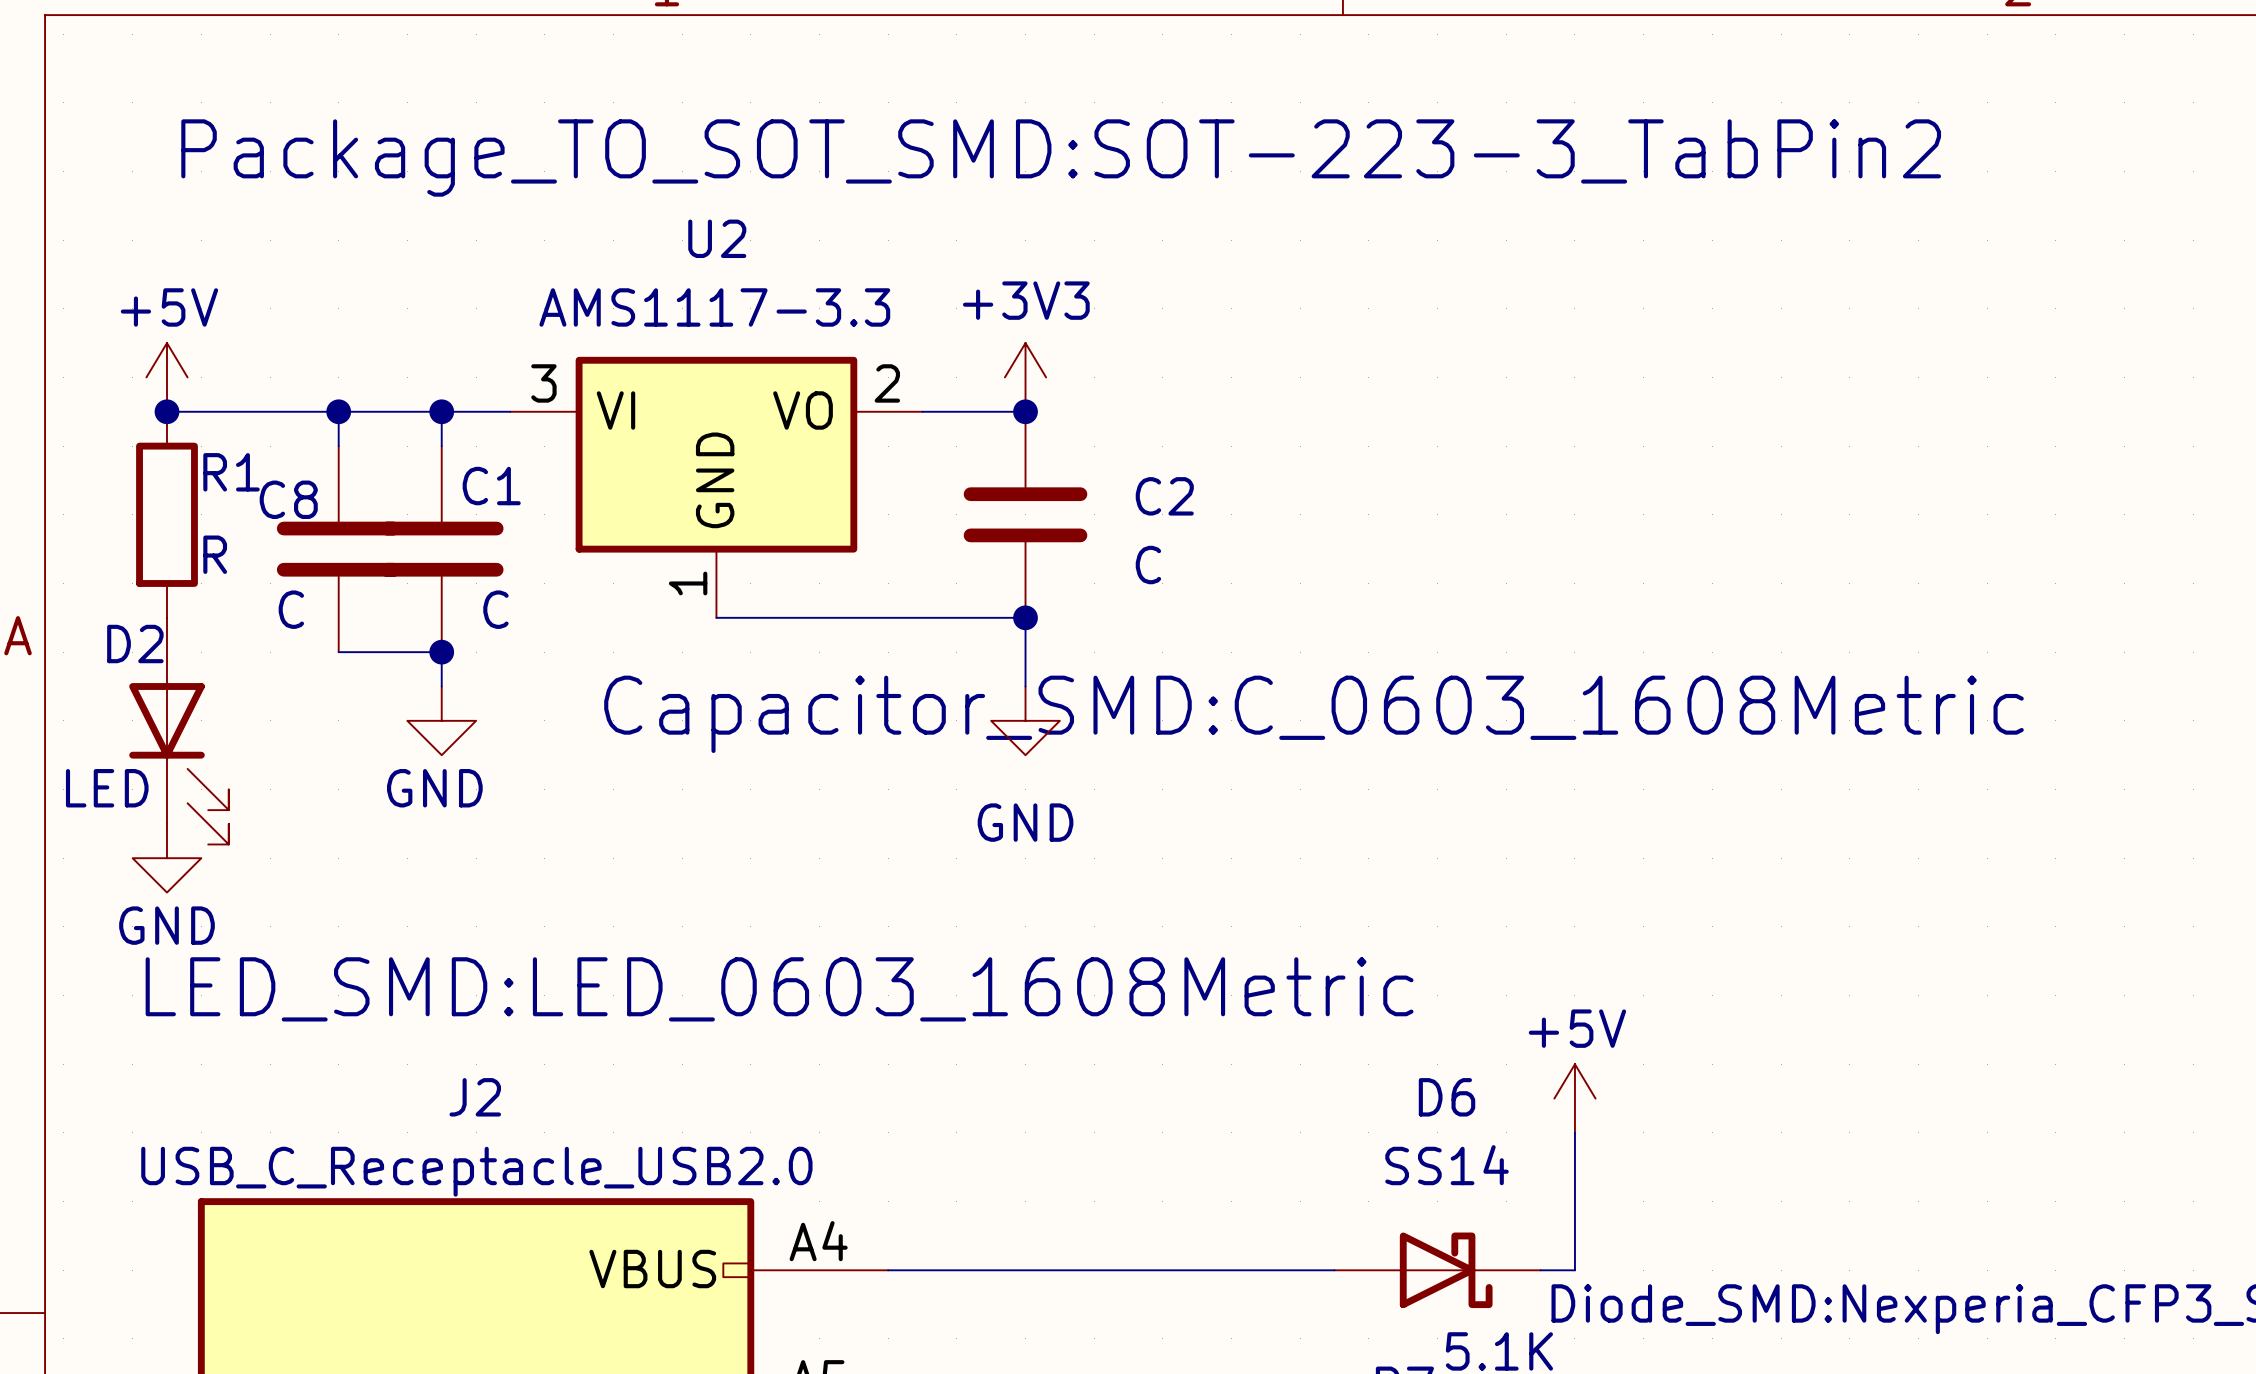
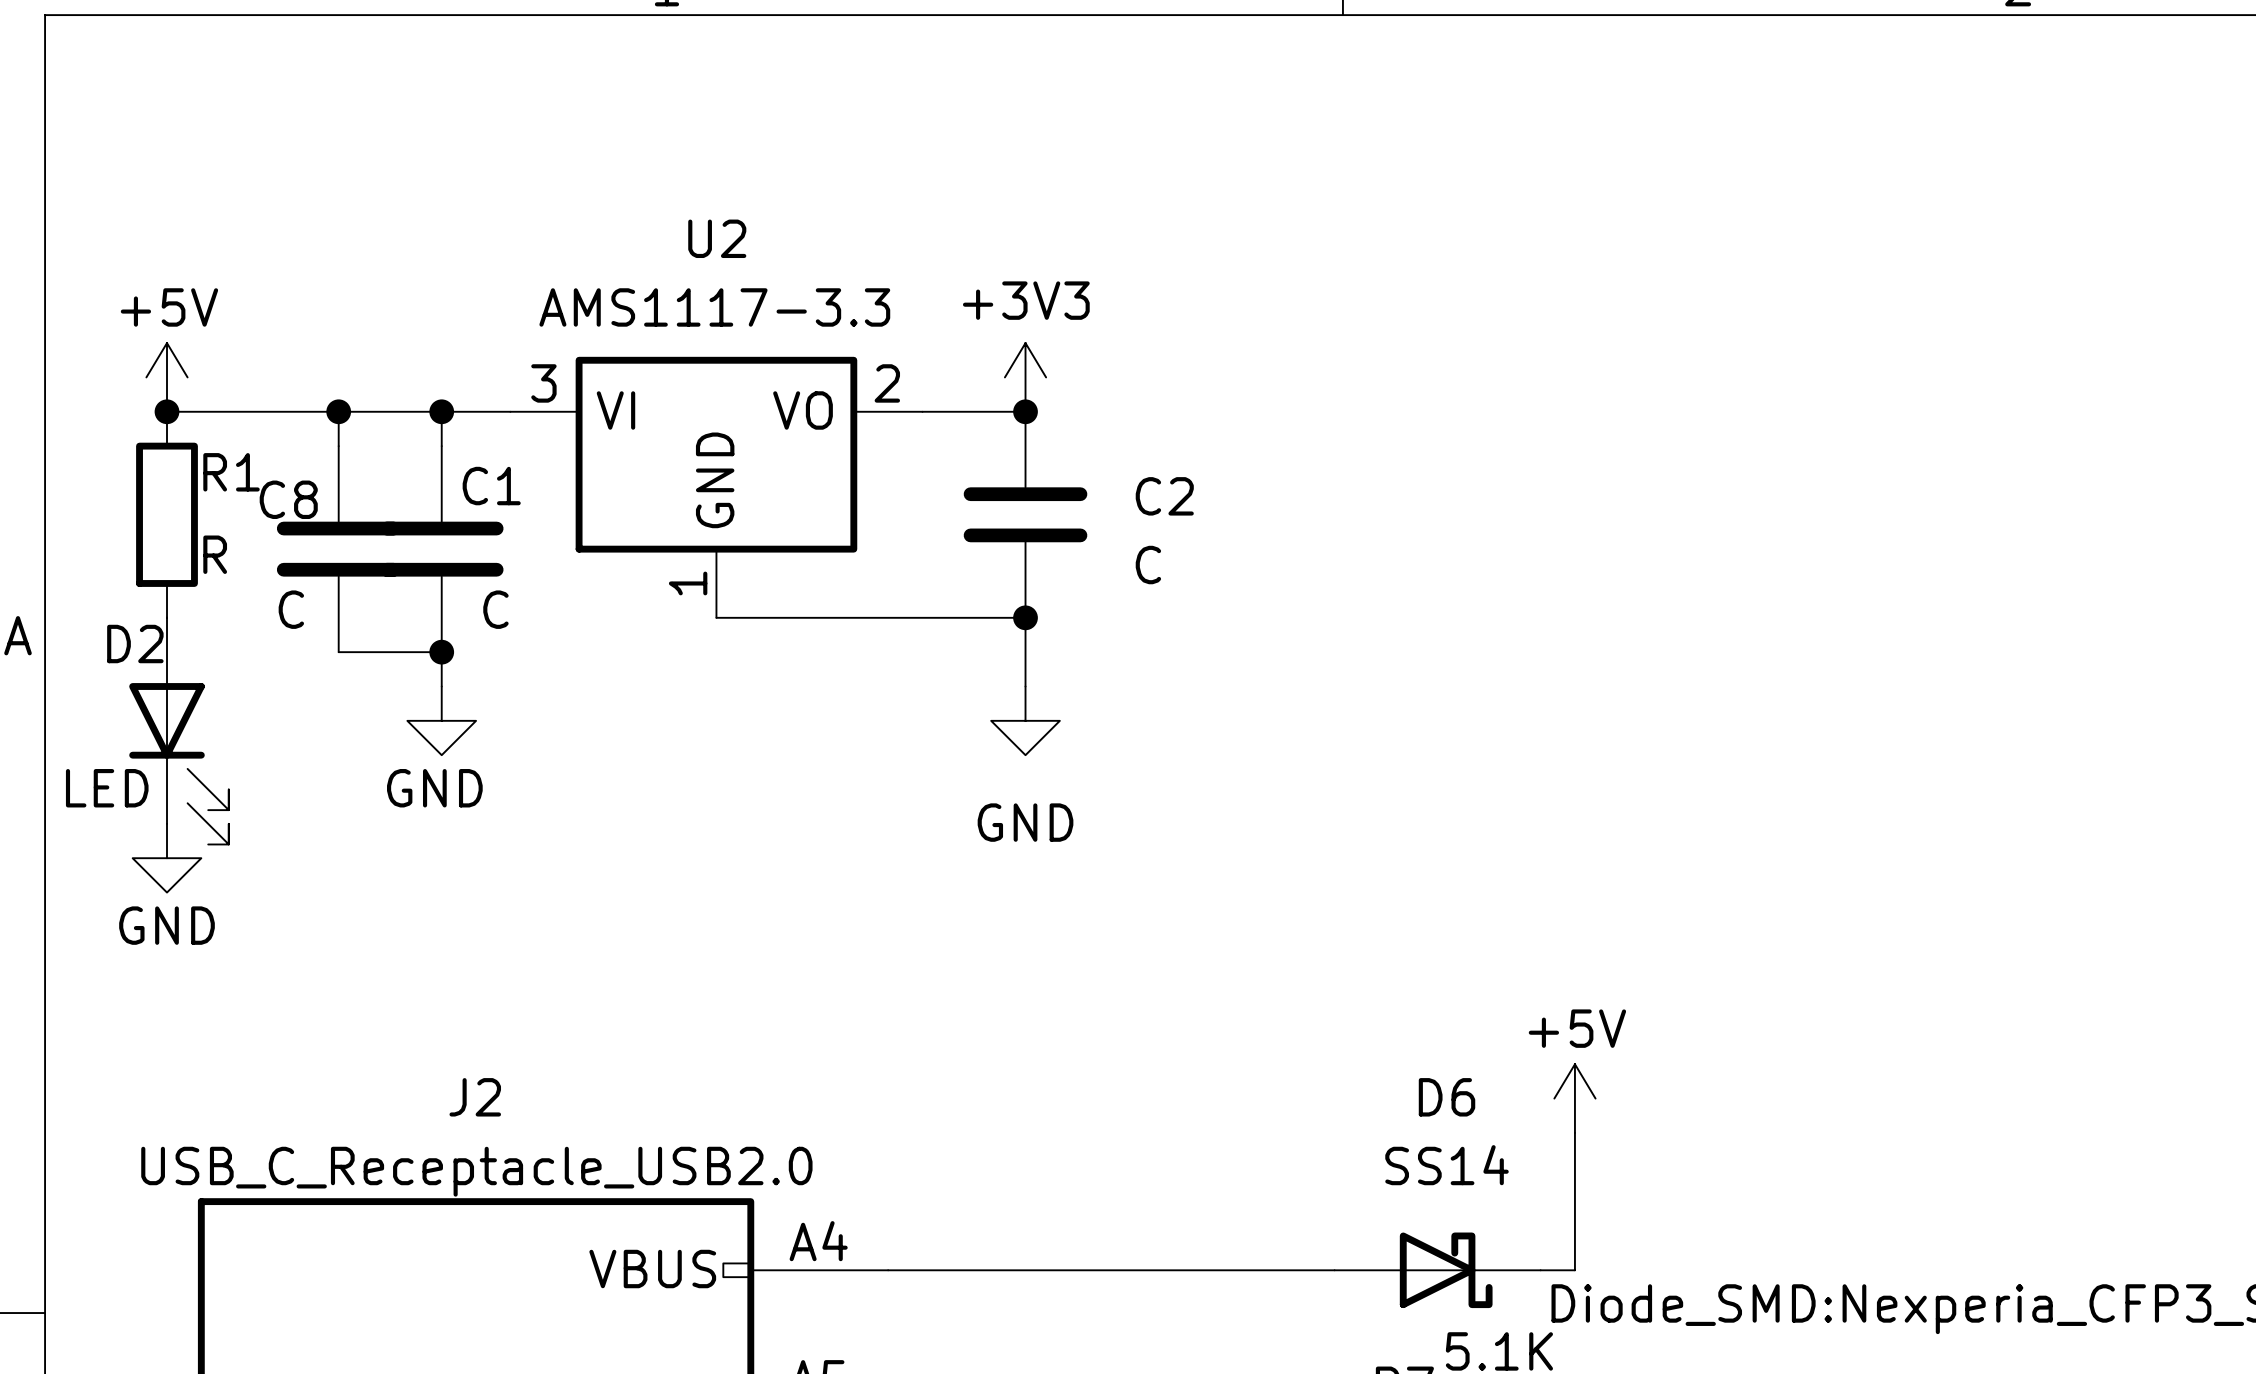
text: Package_TO_SOT_SMD:SOT-223-3_TabPin2 (1061, 158) -> none
text: Capacitor_SMD:C_0603_1608Metric (1313, 714) -> none
text: LED_SMD:LED_0603_1608Metric (779, 989) -> none

